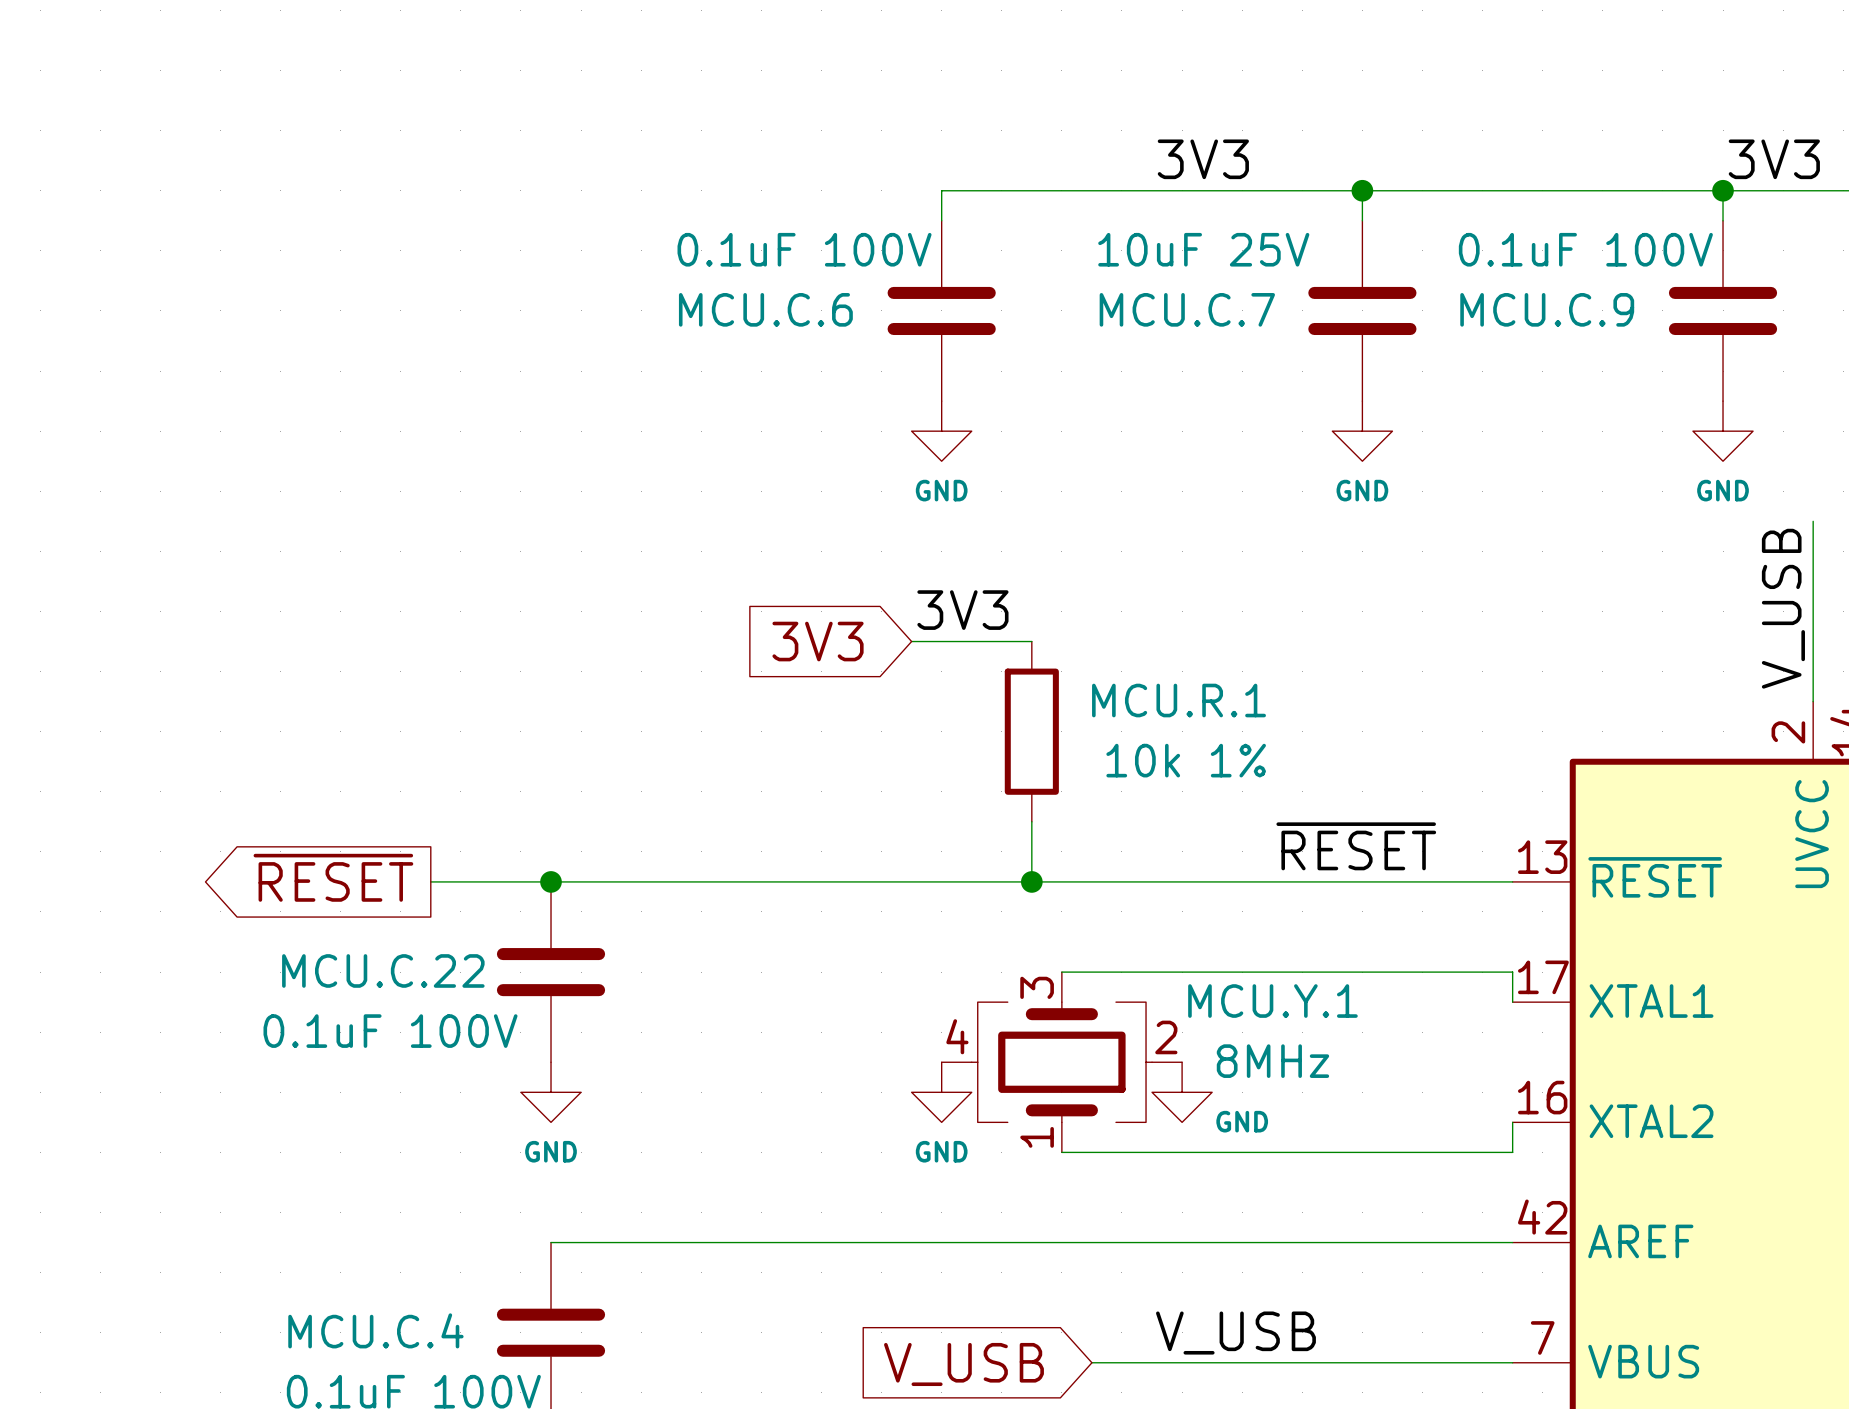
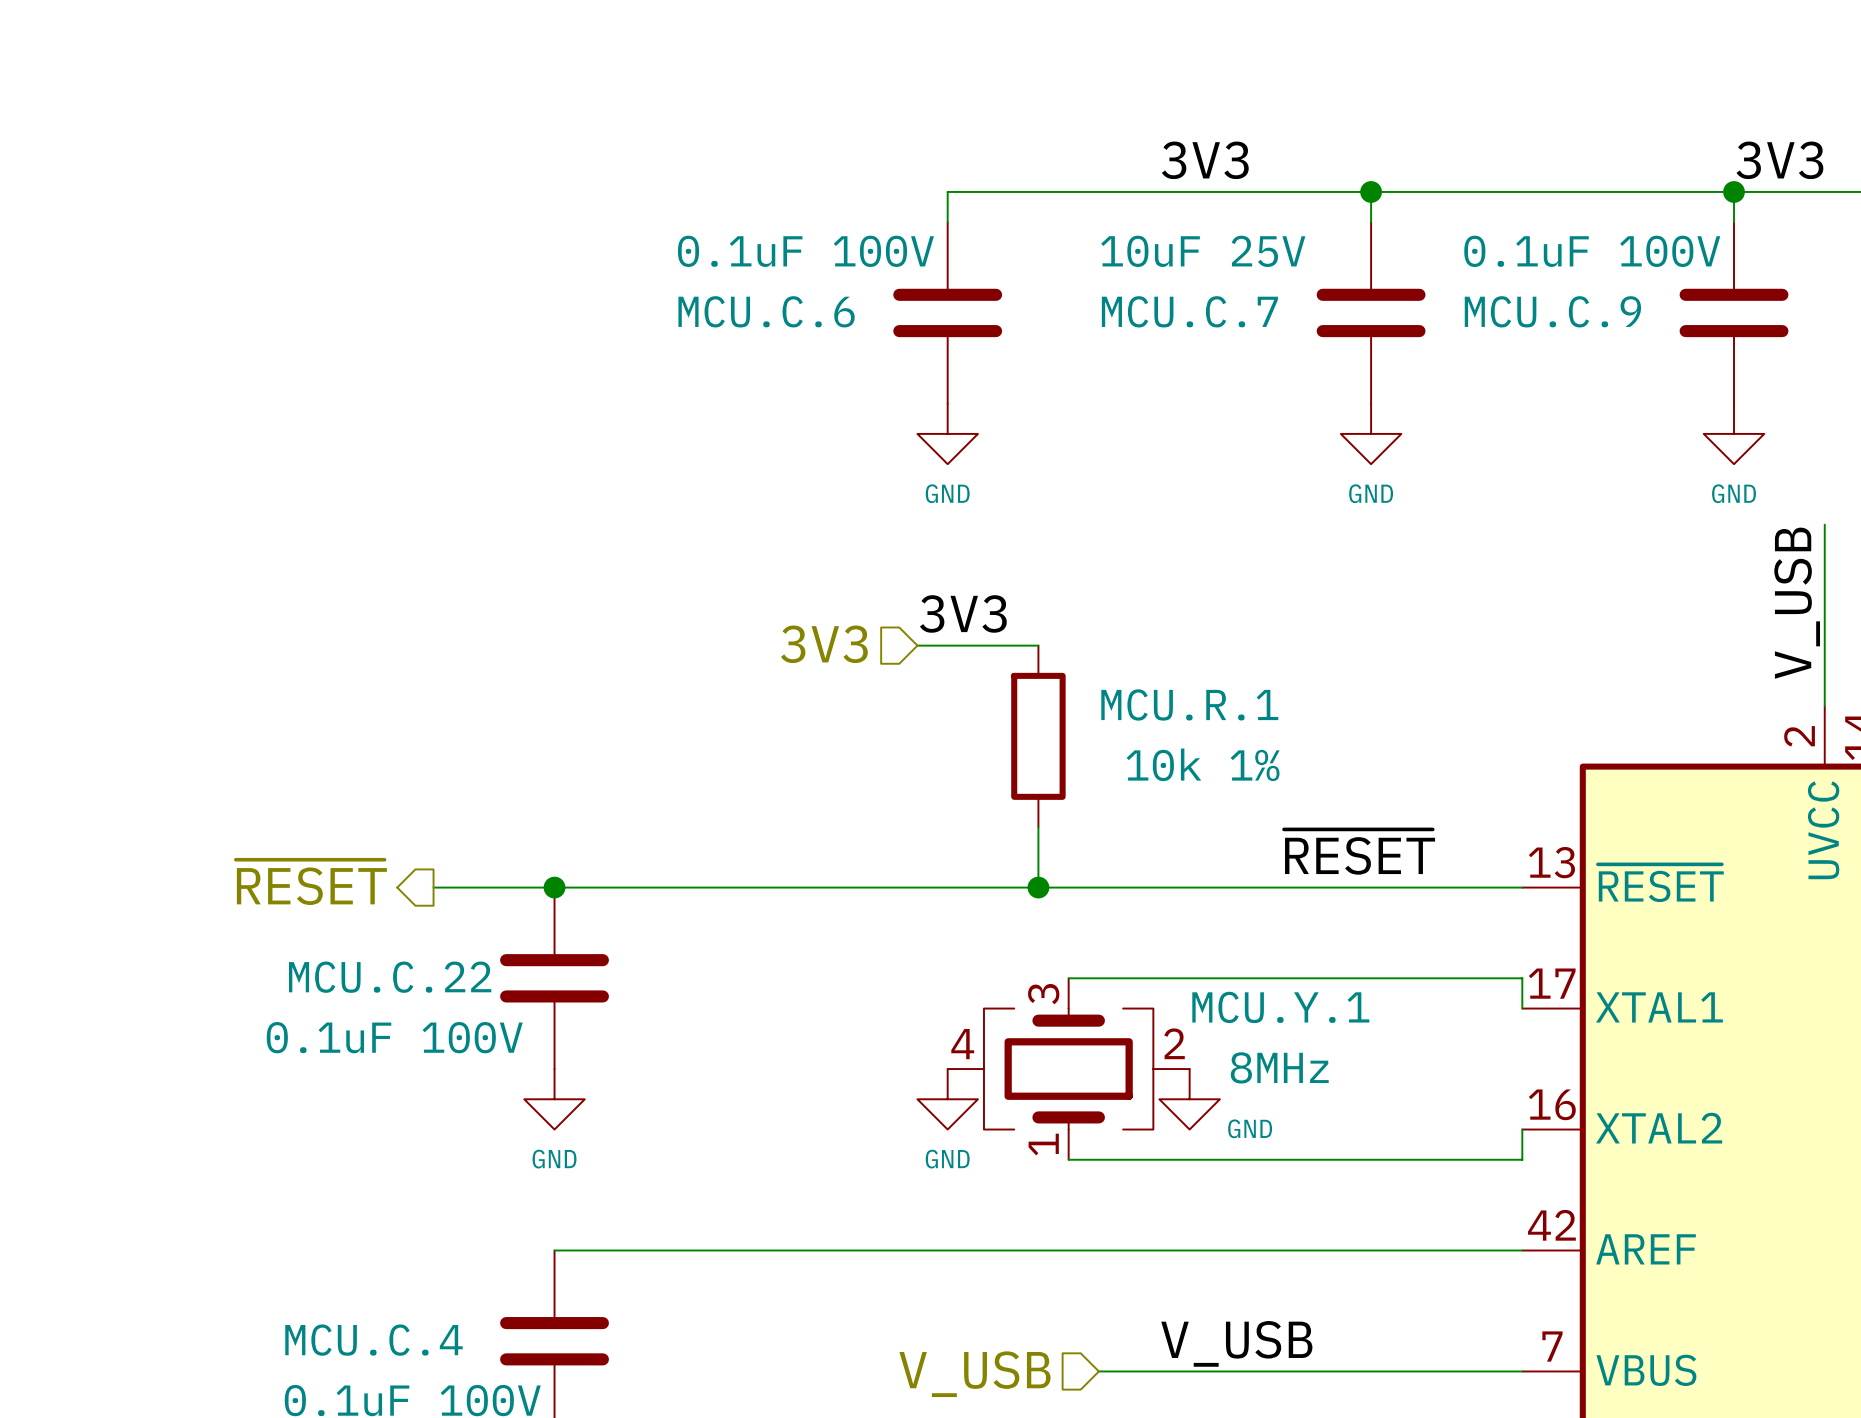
hierarchical label: none -> 3V3 (824, 644)
global label: 3V3 (818, 641) -> none
hierarchical label: none -> ~{RESET} (311, 882)
global label: ~{RESET} (333, 877) -> none
hierarchical label: none -> V_USB (974, 1374)
global label: V_USB (963, 1364) -> none

